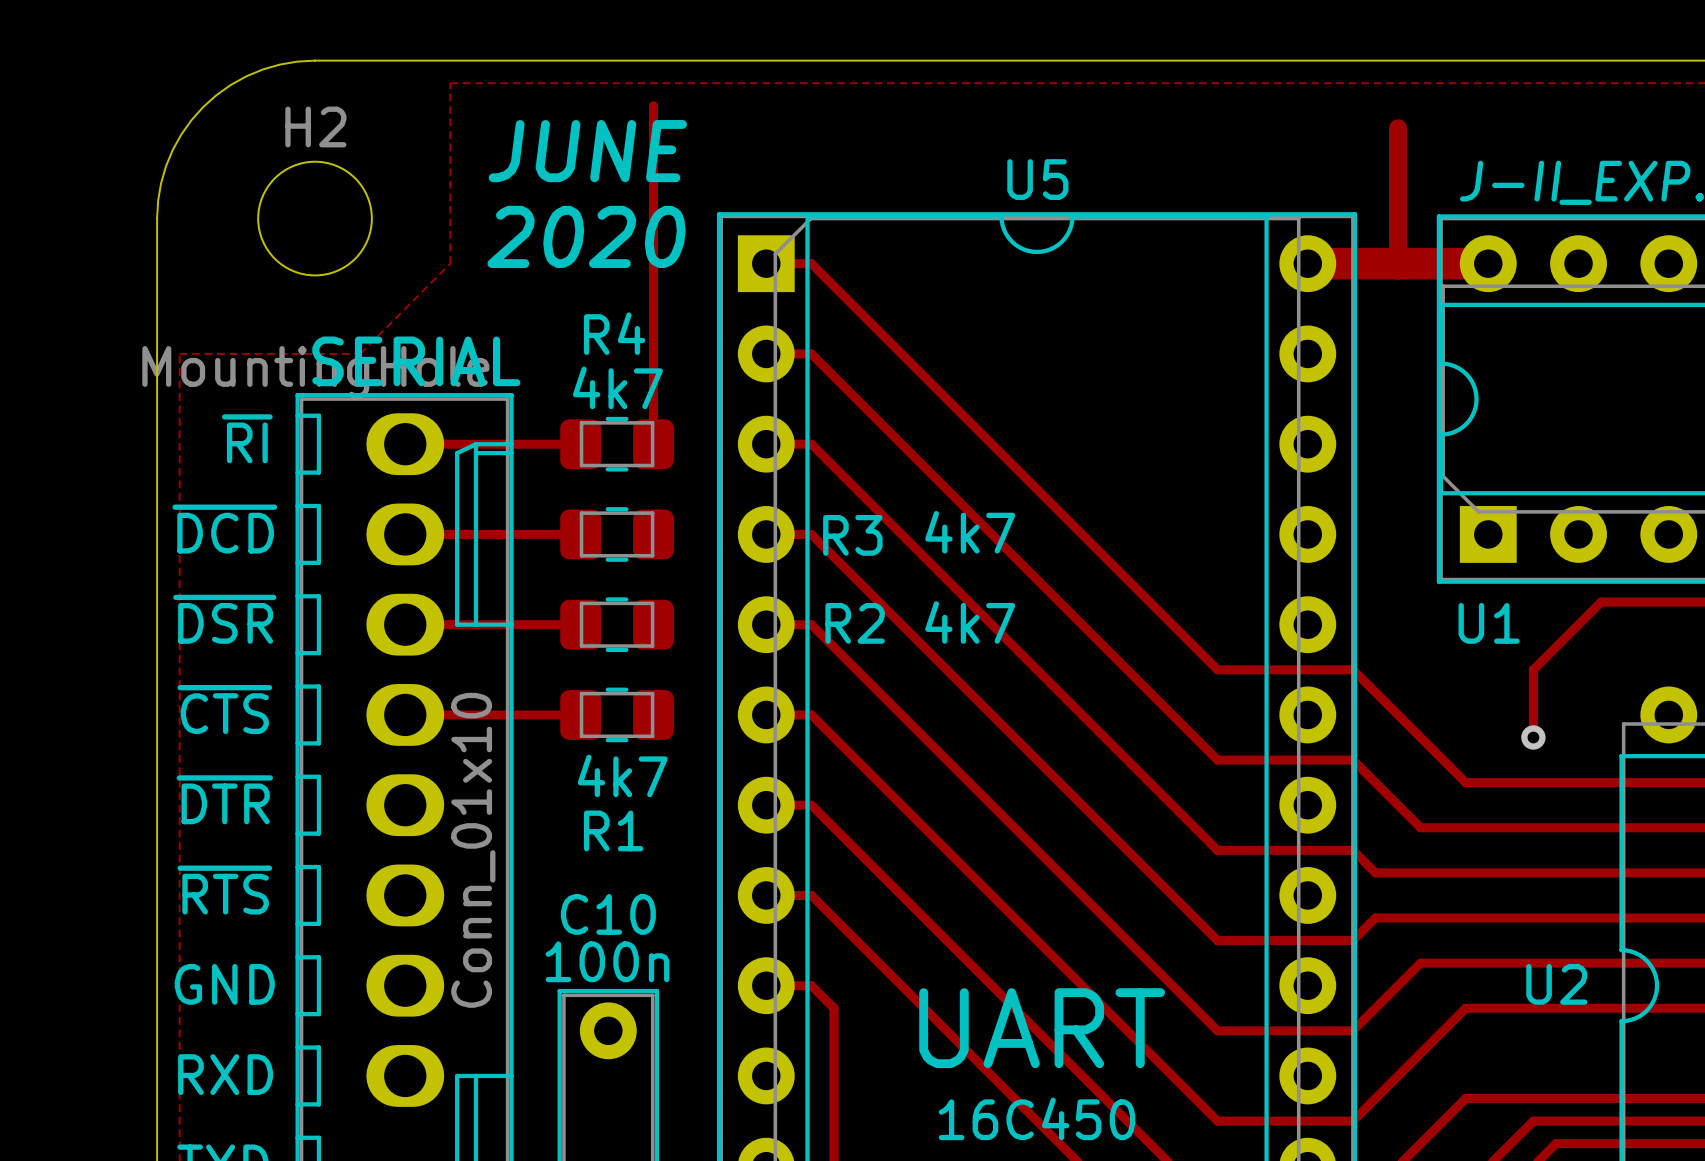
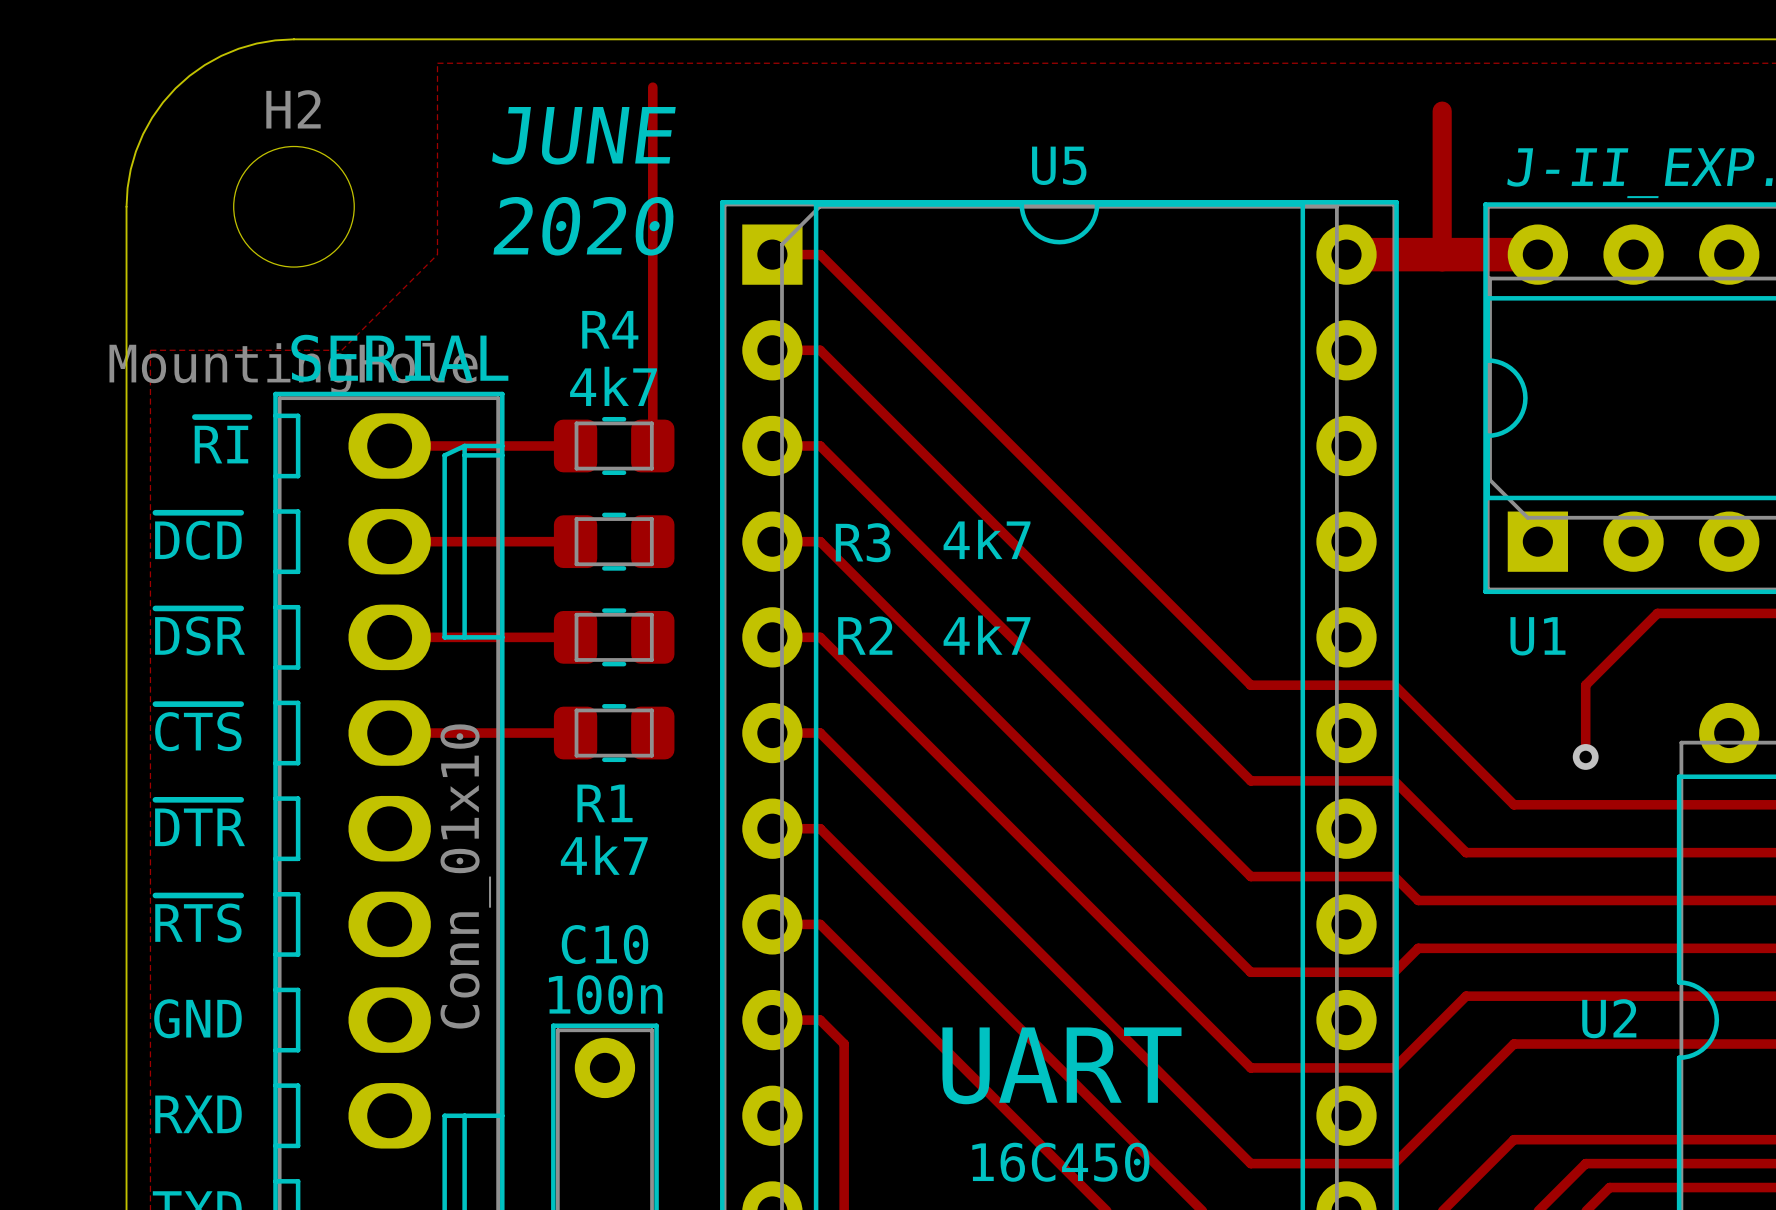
R1 value position: 4k7 (622, 775) -> 4k7 (604, 855)
R1 name position: R1 (613, 830) -> R1 (605, 803)

